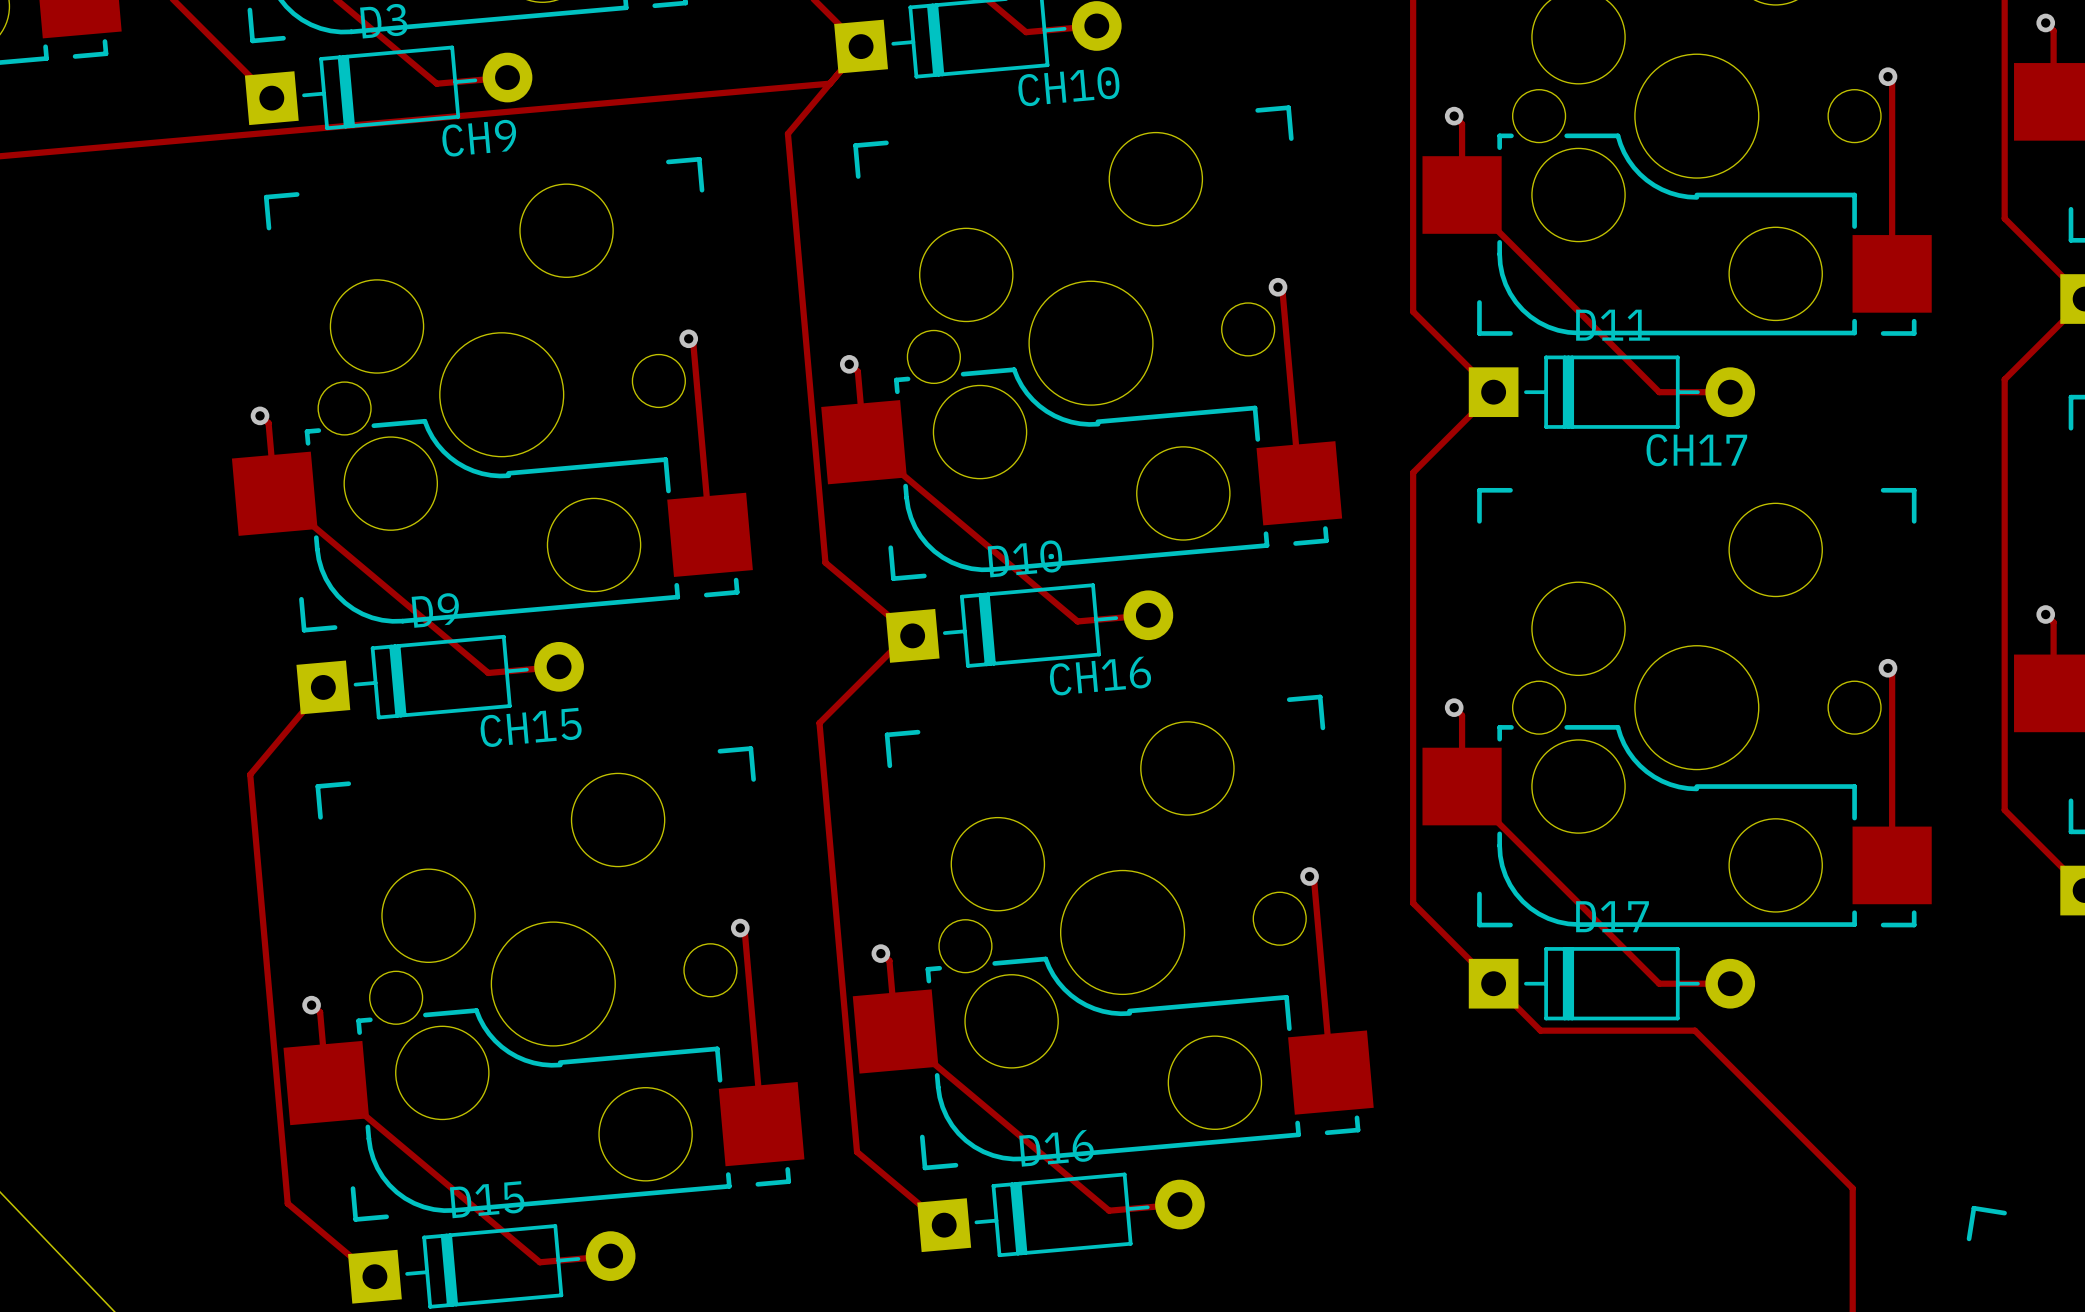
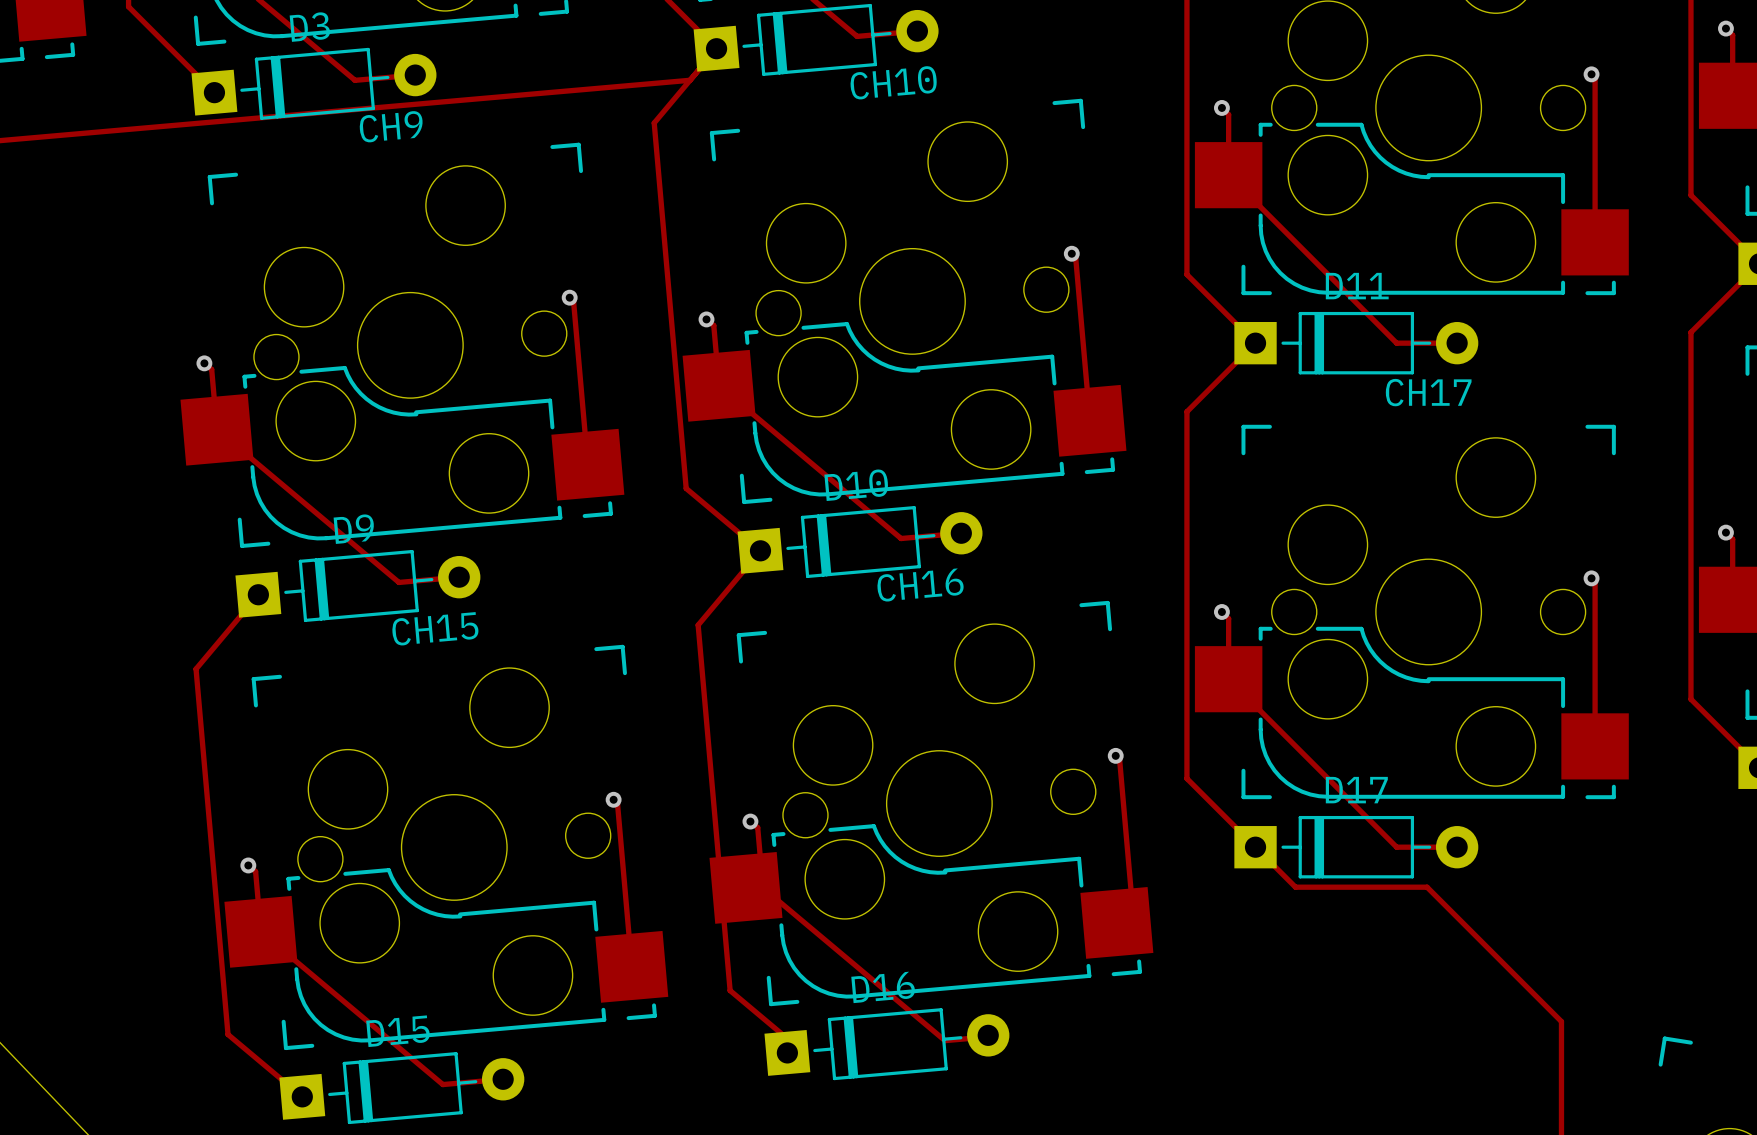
track: (912, 635) (906, 635) (819, 723) (857, 1152) (944, 1225) -> (760, 550) (698, 625) (730, 990) (804, 1052)
track: (1309, 876) (1314, 880) (1330, 1072) -> (1115, 755) (1119, 759) (1133, 922)
via position: (1309, 876) -> (1115, 755)
track: (880, 953) (889, 960) (895, 1031) (1109, 1210) (1179, 1204) -> (750, 821) (757, 827) (762, 887) (945, 1040) (1005, 1035)
via position: (880, 953) -> (750, 821)

